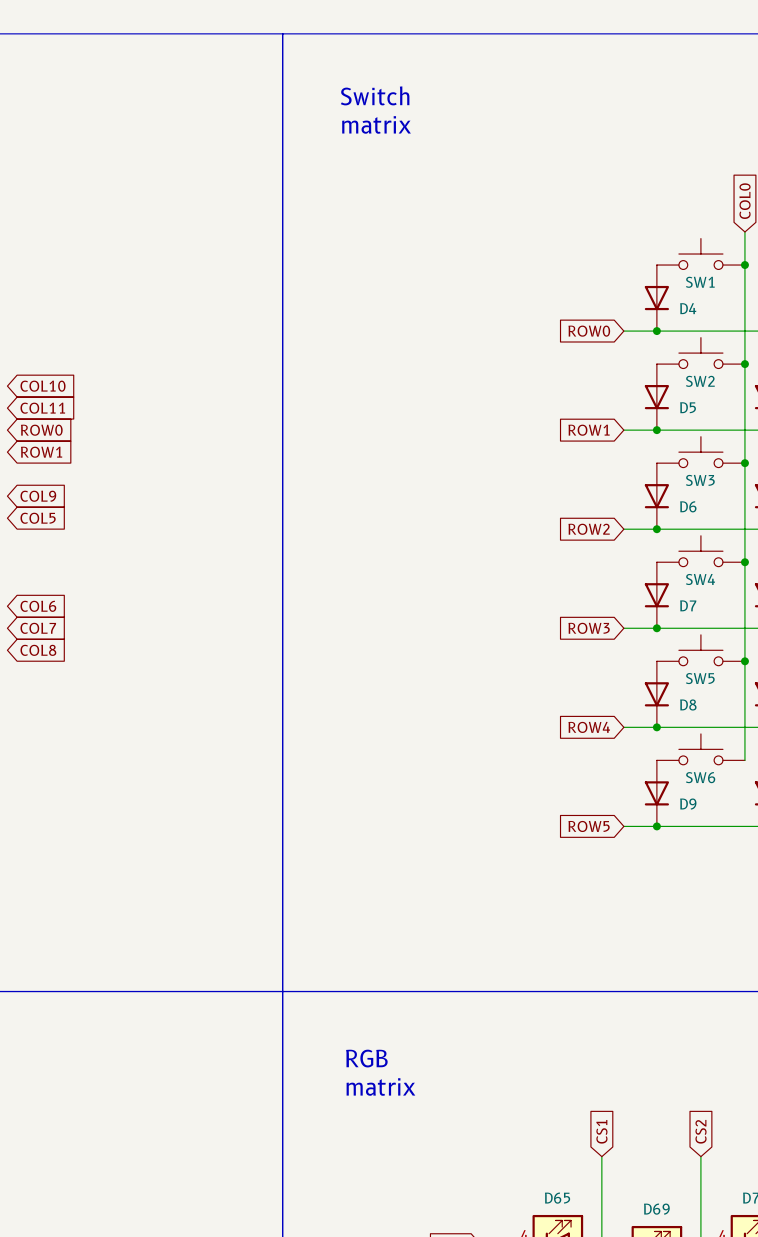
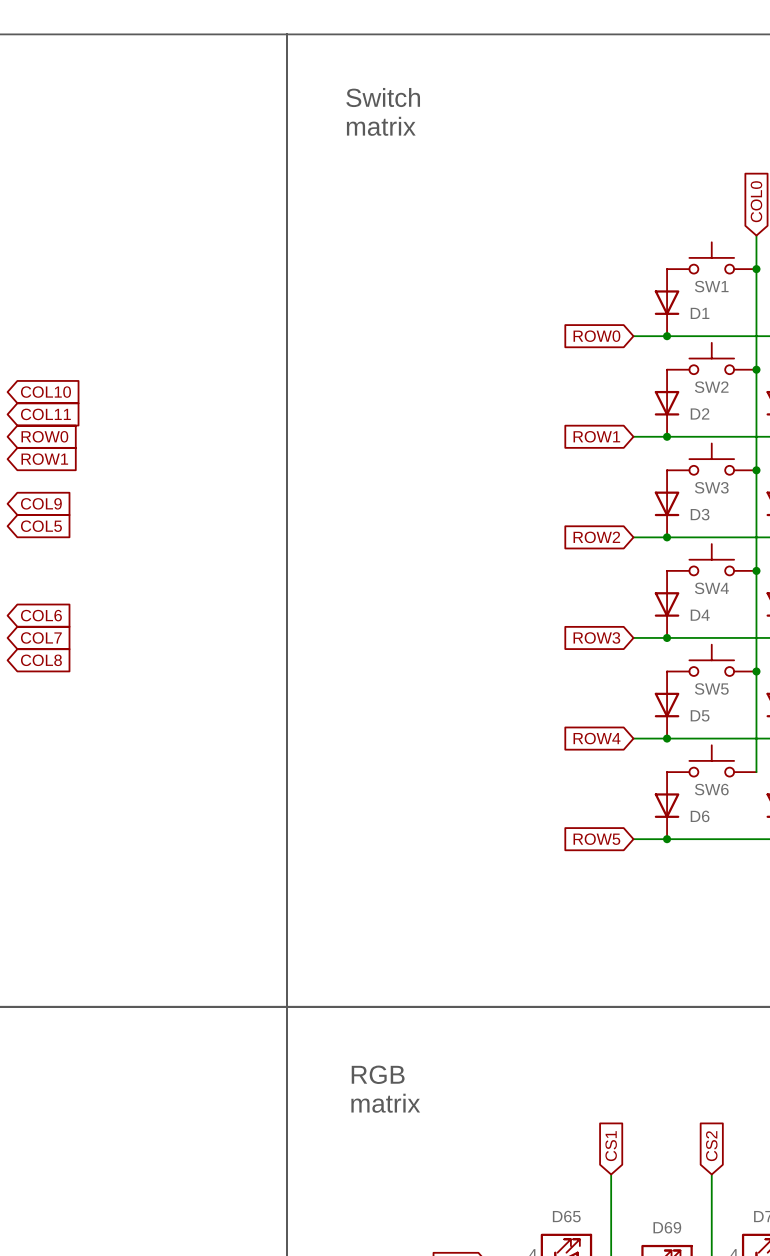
D4 name: D4 (688, 308) -> D1 (700, 313)
D5 name: D5 (688, 407) -> D2 (700, 413)
D6 name: D6 (688, 506) -> D3 (700, 514)
D7 name: D7 (688, 605) -> D4 (700, 615)
D8 name: D8 (688, 704) -> D5 (700, 715)
D9 name: D9 (688, 804) -> D6 (700, 816)

